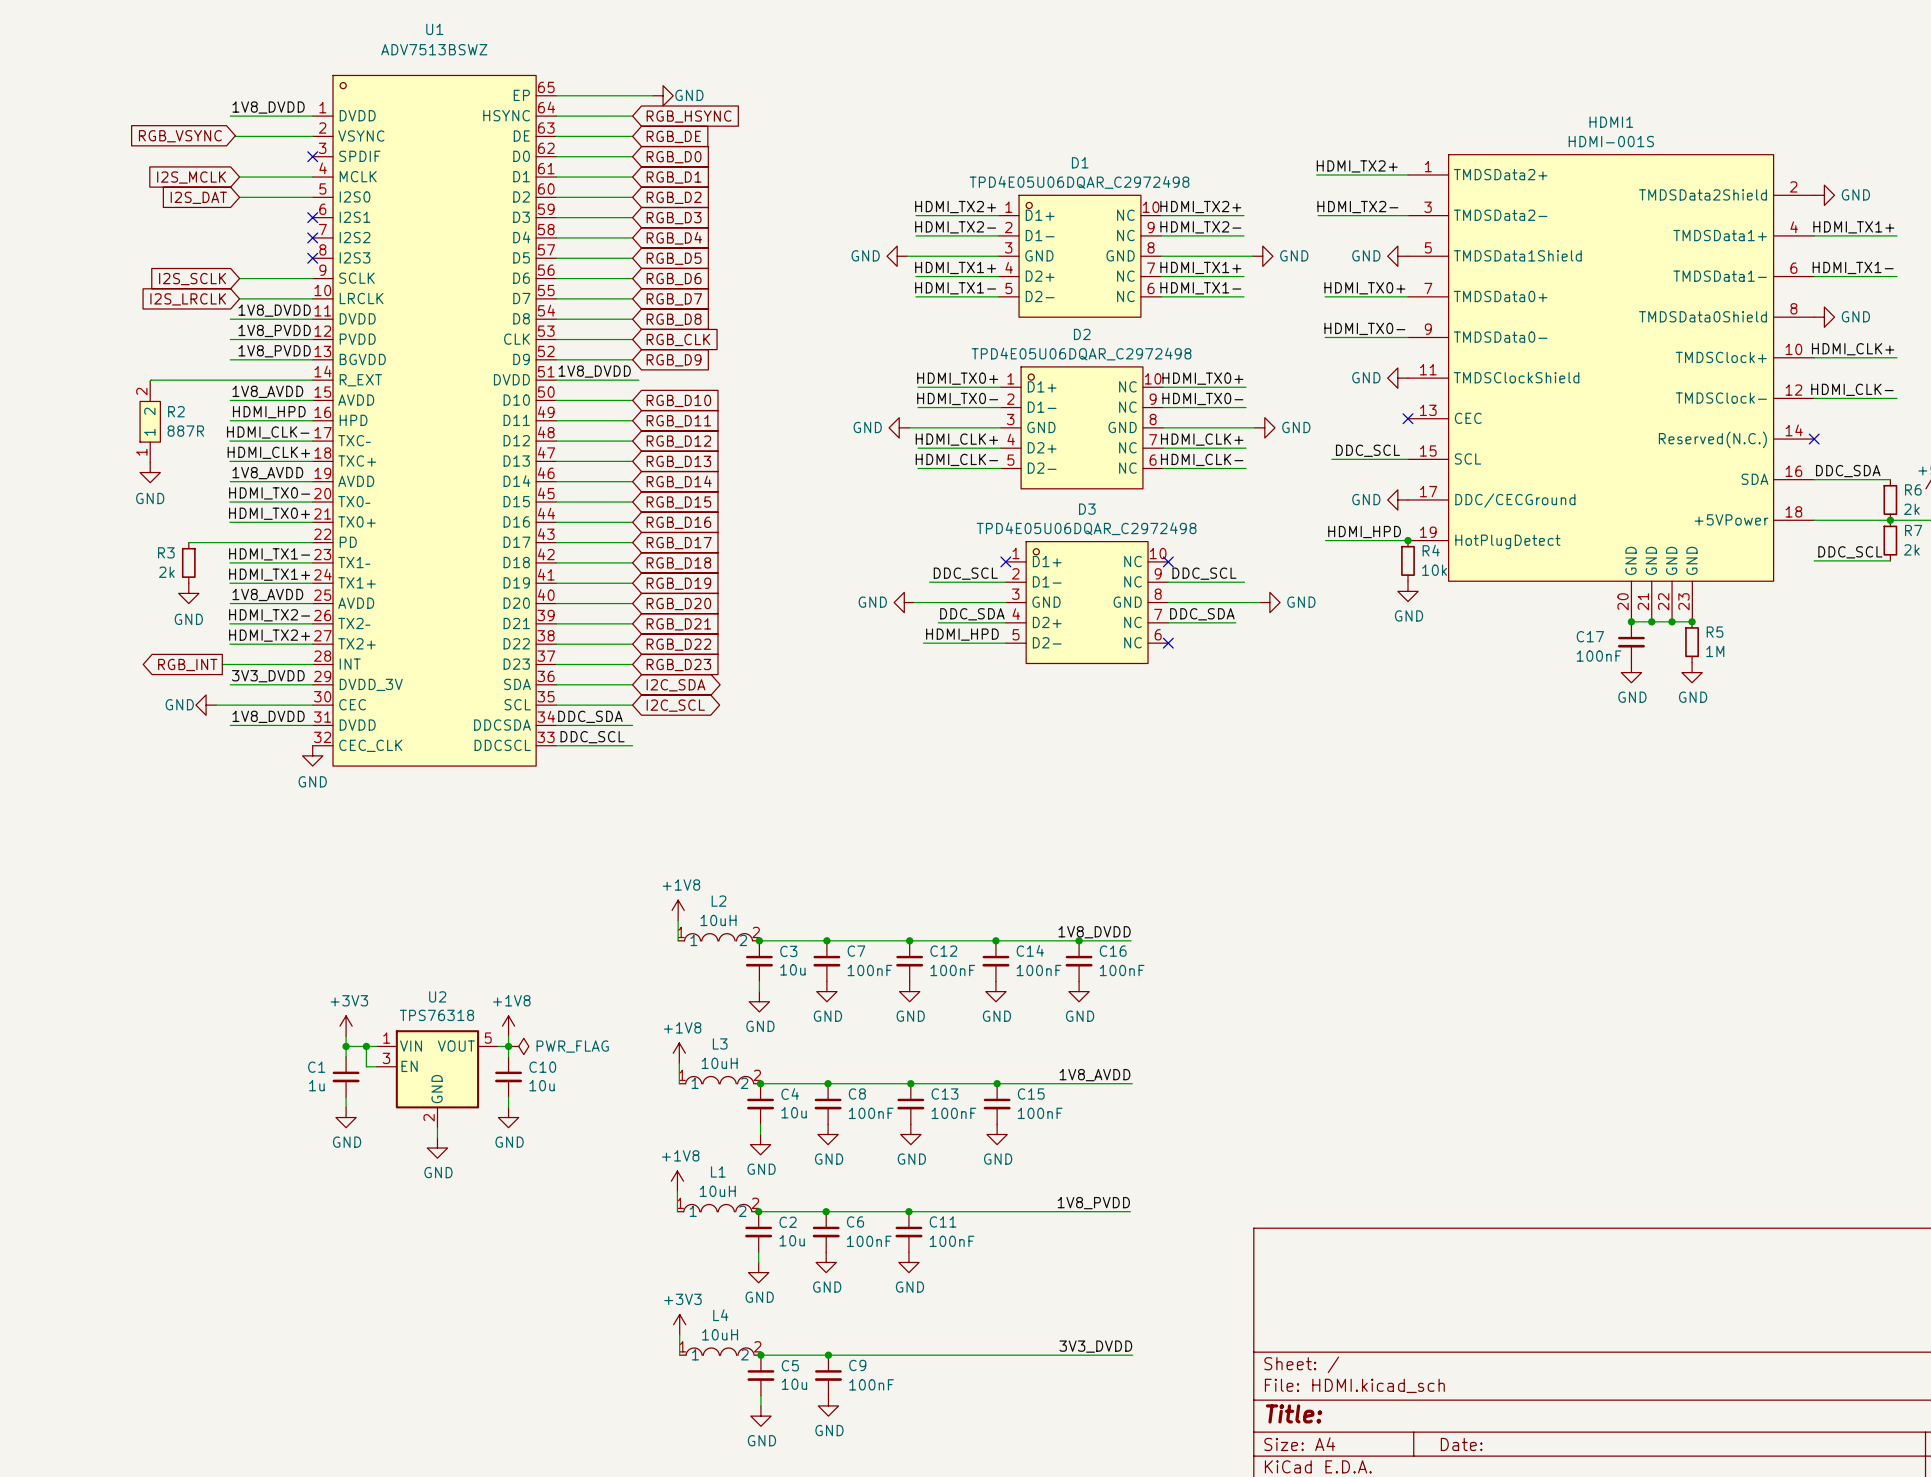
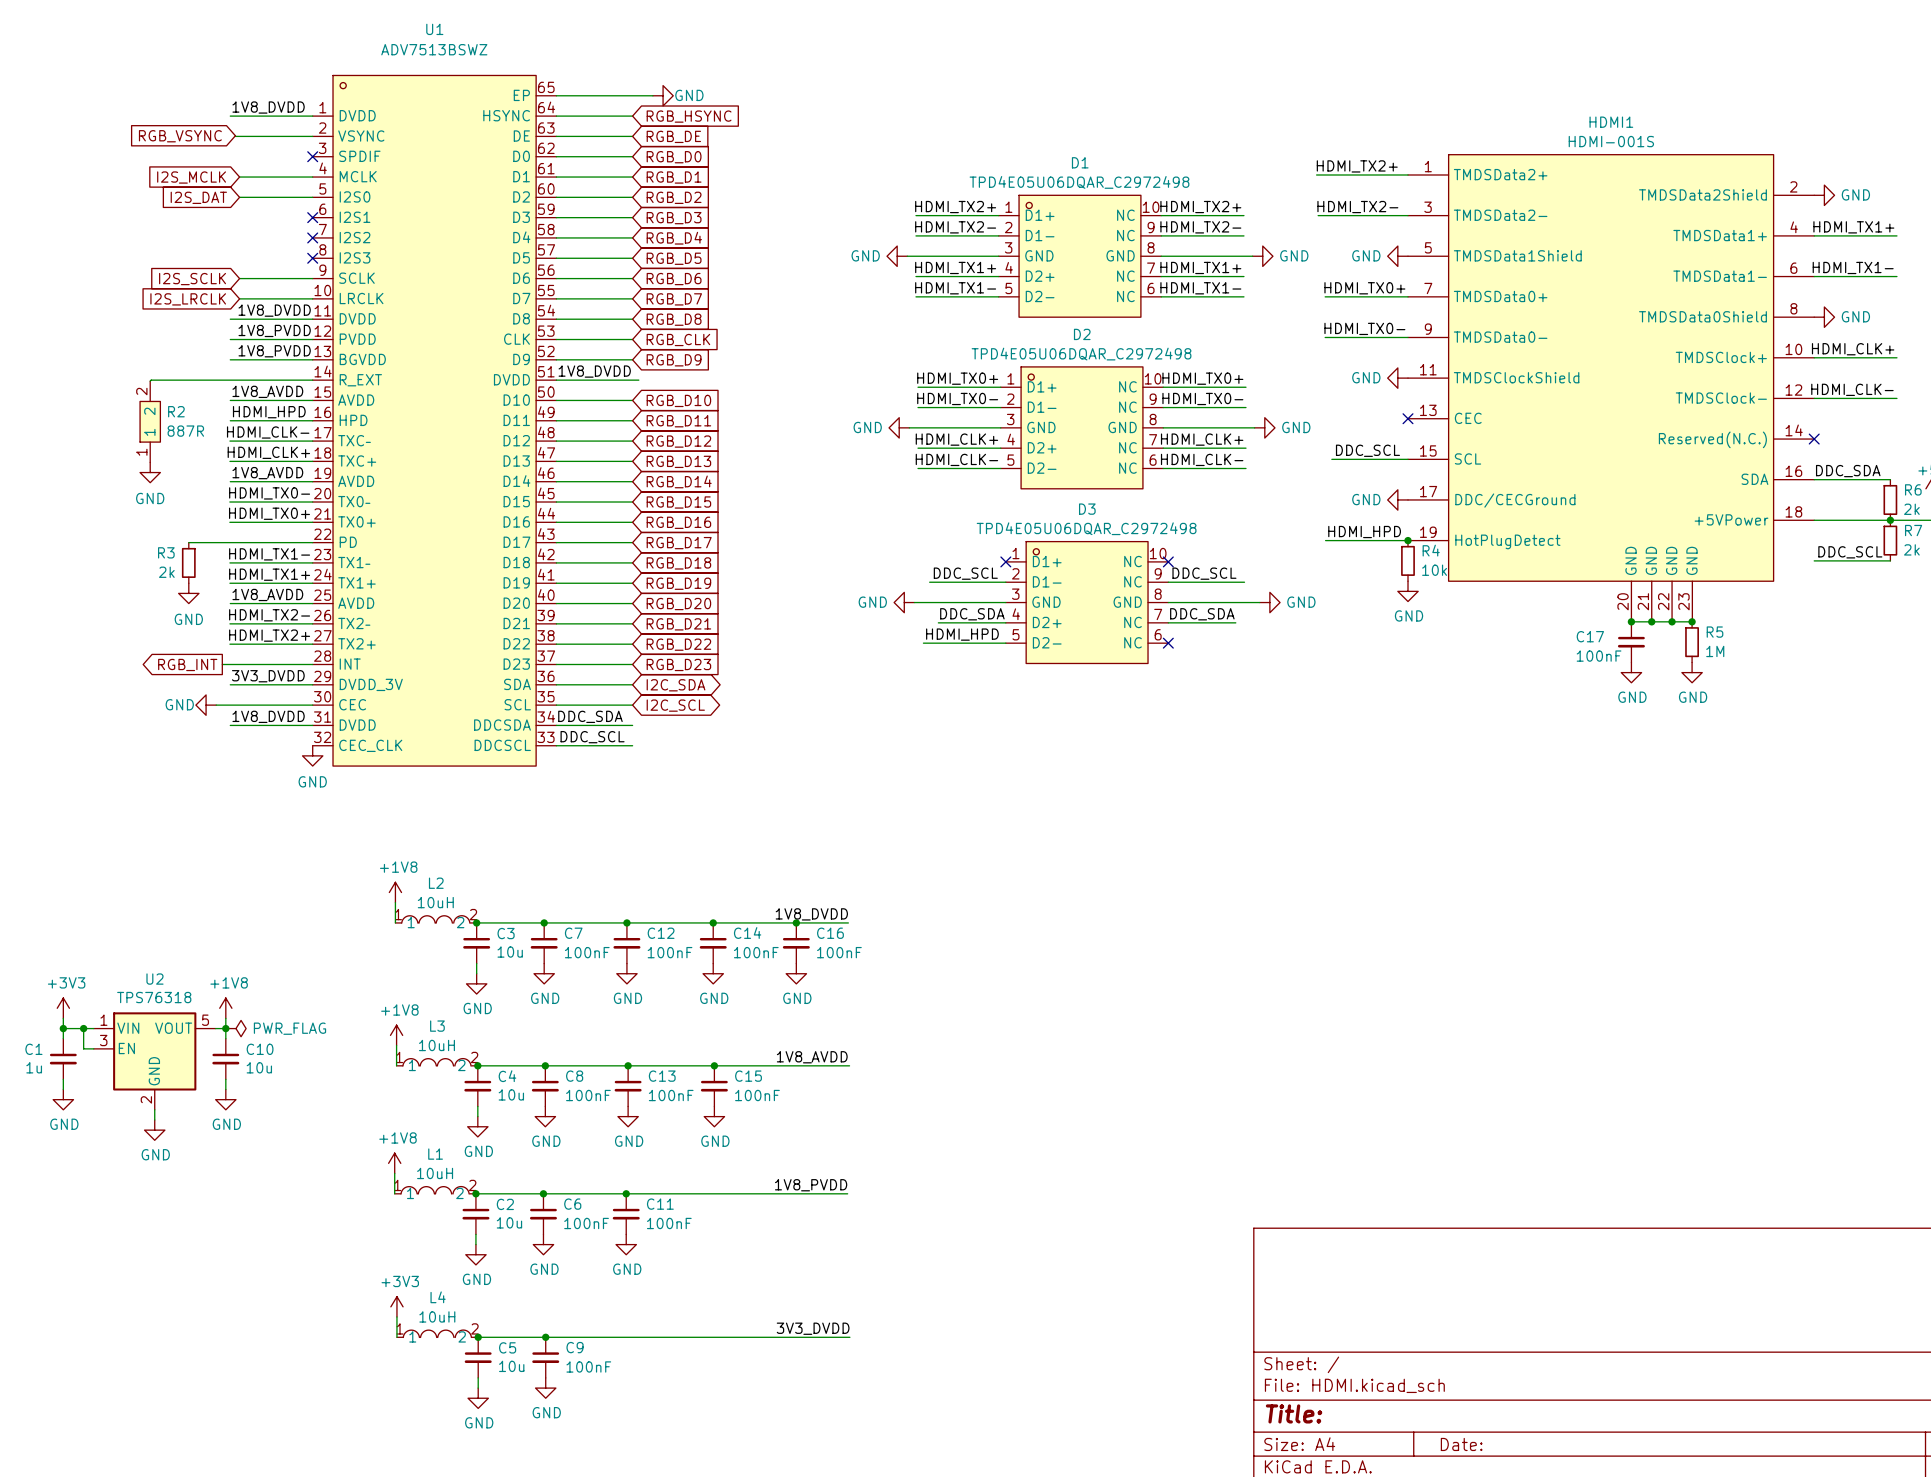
power symbol: none -> +1V8 (395, 892)
wire: none -> (395, 902) (395, 922)
power symbol: +1V8 (678, 910) -> none
label: none -> 1V8_DVDD (811, 914)
wire: (678, 920) (678, 940) -> none
wire: none -> (476, 922) (848, 922)
junction: none -> (476, 922)
junction: none -> (544, 922)
junction: none -> (626, 922)
junction: none -> (713, 922)
junction: none -> (796, 922)
label: 1V8_DVDD (1094, 932) -> none
L2 position: (718, 937) -> (436, 919)
wire: (759, 940) (1131, 940) -> none
junction: (759, 940) -> none
junction: (826, 940) -> none
junction: (909, 940) -> none
junction: (995, 940) -> none
junction: (1079, 940) -> none
C3 position: (759, 961) -> (476, 943)
C7 position: (826, 961) -> (544, 943)
C12 position: (909, 961) -> (626, 943)
C14 position: (995, 961) -> (713, 943)
C16 position: (1079, 961) -> (796, 943)
wire: none -> (476, 963) (476, 973)
power symbol: none -> GND (544, 973)
power symbol: none -> GND (626, 973)
power symbol: none -> GND (713, 973)
power symbol: none -> GND (796, 973)
wire: (759, 981) (759, 991) -> none
power symbol: none -> GND (476, 983)
power symbol: GND (826, 991) -> none
power symbol: GND (909, 991) -> none
power symbol: GND (995, 991) -> none
power symbol: GND (1079, 991) -> none
power symbol: GND (759, 1001) -> none
power symbol: none -> +3V3 (63, 1008)
power symbol: none -> +1V8 (225, 1008)
wire: none -> (63, 1018) (63, 1038)
power symbol: +3V3 (346, 1026) -> none
power symbol: +1V8 (508, 1026) -> none
wire: none -> (63, 1028) (93, 1028)
junction: none -> (63, 1028)
wire: none -> (83, 1028) (83, 1048) (93, 1048)
junction: none -> (83, 1028)
wire: none -> (215, 1028) (225, 1028)
junction: none -> (225, 1028)
power symbol: none -> PWR_FLAG (235, 1028)
power symbol: none -> +1V8 (396, 1035)
wire: (346, 1036) (346, 1056) -> (225, 1018) (225, 1038)
wire: (346, 1046) (376, 1046) -> none
junction: (346, 1046) -> none
wire: (366, 1046) (366, 1066) (376, 1066) -> none
junction: (366, 1046) -> none
wire: (498, 1046) (508, 1046) -> none
junction: (508, 1046) -> none
power symbol: PWR_FLAG (518, 1046) -> none
power symbol: +1V8 (679, 1053) -> none
label: none -> 1V8_AVDD (812, 1057)
wire: (679, 1063) (679, 1083) -> none
wire: none -> (477, 1065) (849, 1065)
junction: none -> (477, 1065)
junction: none -> (545, 1065)
junction: none -> (628, 1065)
junction: none -> (714, 1065)
label: 1V8_AVDD (1094, 1075) -> none
C1 position: (346, 1076) -> (63, 1059)
C10 position: (508, 1076) -> (225, 1059)
U2 position: (437, 1078) -> (154, 1061)
wire: none -> (63, 1079) (63, 1089)
L3 position: (719, 1080) -> (437, 1062)
wire: (760, 1083) (1132, 1083) -> none
junction: (760, 1083) -> none
junction: (828, 1083) -> none
junction: (910, 1083) -> none
junction: (997, 1083) -> none
wire: (346, 1097) (346, 1107) -> (225, 1079) (225, 1089)
wire: (508, 1097) (508, 1107) -> (477, 1106) (477, 1116)
power symbol: none -> GND (63, 1099)
power symbol: none -> GND (225, 1099)
C4 position: (760, 1104) -> (477, 1086)
C8 position: (828, 1104) -> (545, 1086)
C13 position: (910, 1104) -> (628, 1086)
C15 position: (997, 1104) -> (714, 1086)
wire: none -> (154, 1109) (154, 1119)
power symbol: none -> GND (545, 1116)
power symbol: none -> GND (628, 1116)
power symbol: GND (346, 1117) -> none
power symbol: GND (508, 1117) -> none
wire: (760, 1124) (760, 1134) -> none
power symbol: none -> GND (477, 1126)
wire: (437, 1127) (437, 1137) -> (475, 1234) (475, 1244)
power symbol: none -> GND (154, 1130)
power symbol: GND (828, 1134) -> none
power symbol: GND (910, 1134) -> none
power symbol: GND (997, 1134) -> none
power symbol position: GND (760, 1144) -> GND (714, 1116)
power symbol: GND (437, 1148) -> none
power symbol: none -> +1V8 (394, 1163)
wire: none -> (394, 1173) (394, 1193)
power symbol: +1V8 (677, 1181) -> none
label: none -> 1V8_PVDD (811, 1185)
wire: (677, 1191) (677, 1211) -> none
wire: none -> (475, 1193) (847, 1193)
junction: none -> (475, 1193)
junction: none -> (543, 1193)
junction: none -> (626, 1193)
label: 1V8_PVDD (1093, 1203) -> none
L1 position: (718, 1208) -> (435, 1190)
wire: (758, 1211) (1130, 1211) -> none
junction: (758, 1211) -> none
junction: (826, 1211) -> none
junction: (908, 1211) -> none
C2 position: (758, 1232) -> (475, 1214)
C6 position: (826, 1232) -> (543, 1214)
C11 position: (908, 1232) -> (626, 1214)
power symbol: none -> GND (543, 1244)
power symbol: none -> GND (626, 1244)
wire: (758, 1252) (758, 1262) -> none
power symbol: none -> GND (475, 1254)
power symbol: GND (826, 1262) -> none
power symbol: GND (908, 1262) -> none
power symbol: GND (758, 1272) -> none
power symbol: none -> +3V3 (396, 1306)
wire: none -> (396, 1316) (396, 1337)
power symbol: +3V3 (679, 1324) -> none
label: none -> 3V3_DVDD (813, 1328)
wire: (679, 1334) (679, 1355) -> none
wire: none -> (478, 1337) (849, 1337)
junction: none -> (478, 1337)
junction: none -> (545, 1337)
label: 3V3_DVDD (1095, 1346) -> none
L4 position: (720, 1351) -> (437, 1333)
wire: (760, 1355) (1132, 1355) -> none
junction: (760, 1355) -> none
junction: (828, 1355) -> none
C5 position: (760, 1375) -> (478, 1357)
C9 position: (828, 1375) -> (545, 1357)
wire: none -> (478, 1377) (478, 1388)
power symbol: none -> GND (545, 1388)
wire: (760, 1395) (760, 1405) -> none
power symbol: none -> GND (478, 1398)
power symbol: GND (828, 1405) -> none
power symbol: GND (760, 1416) -> none

